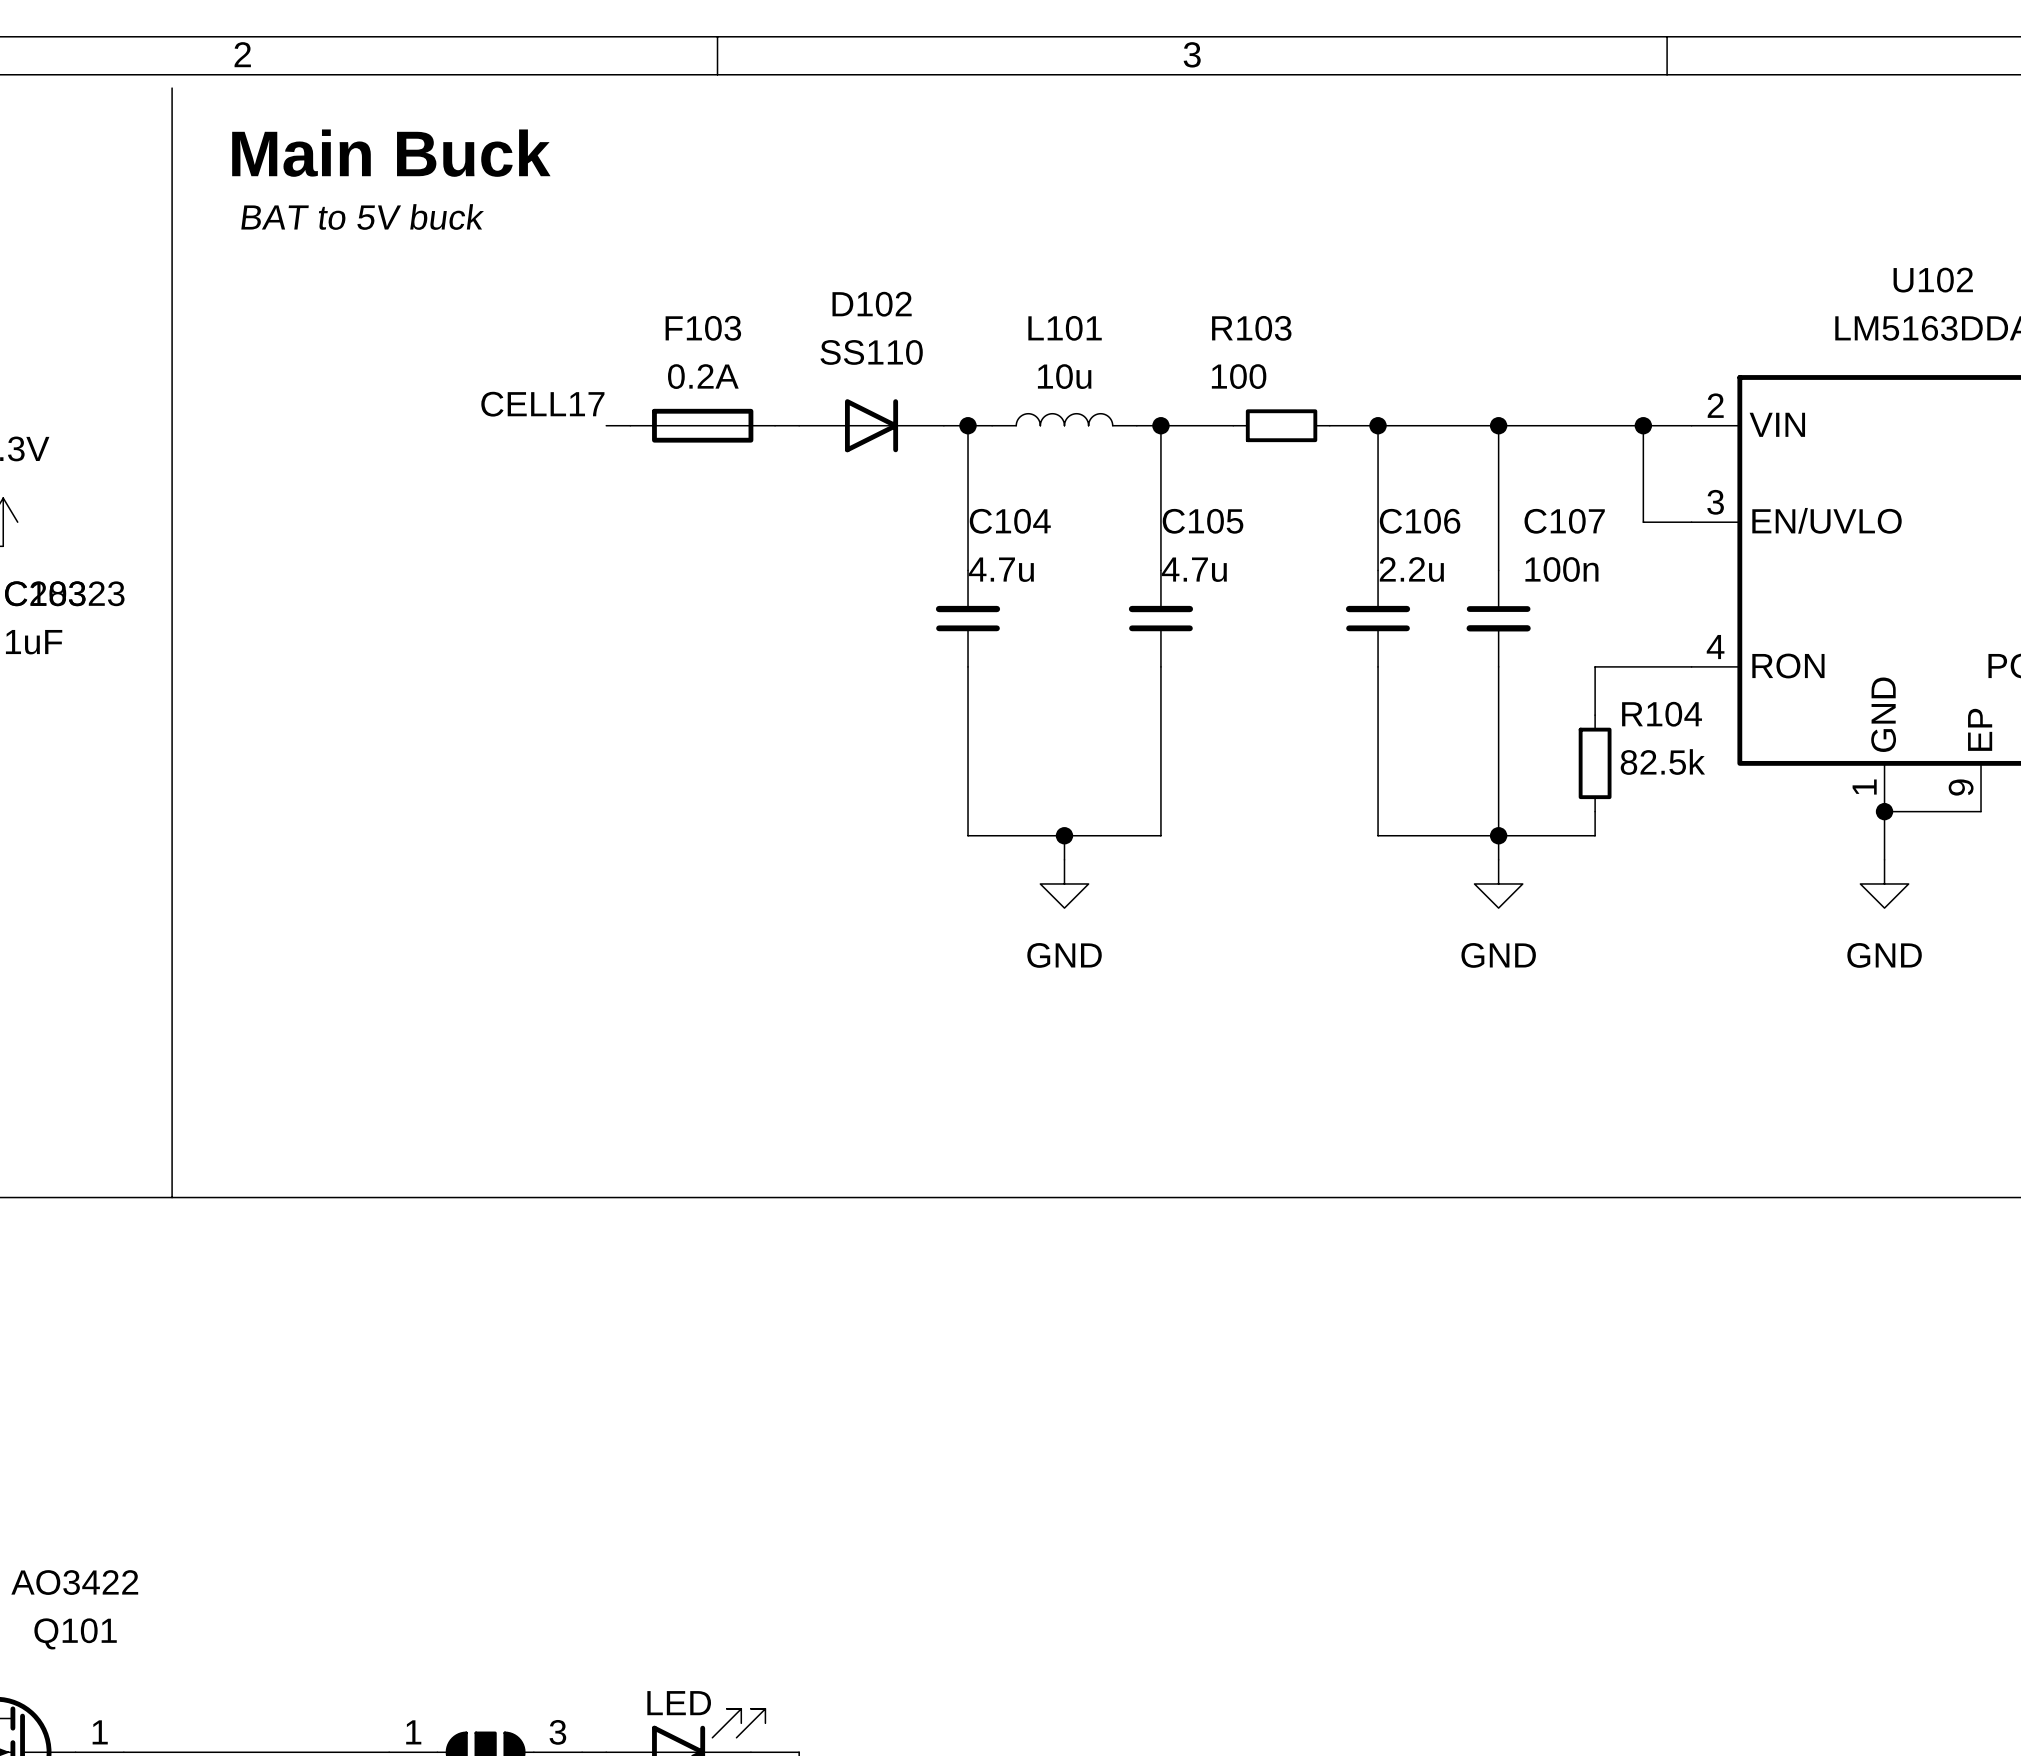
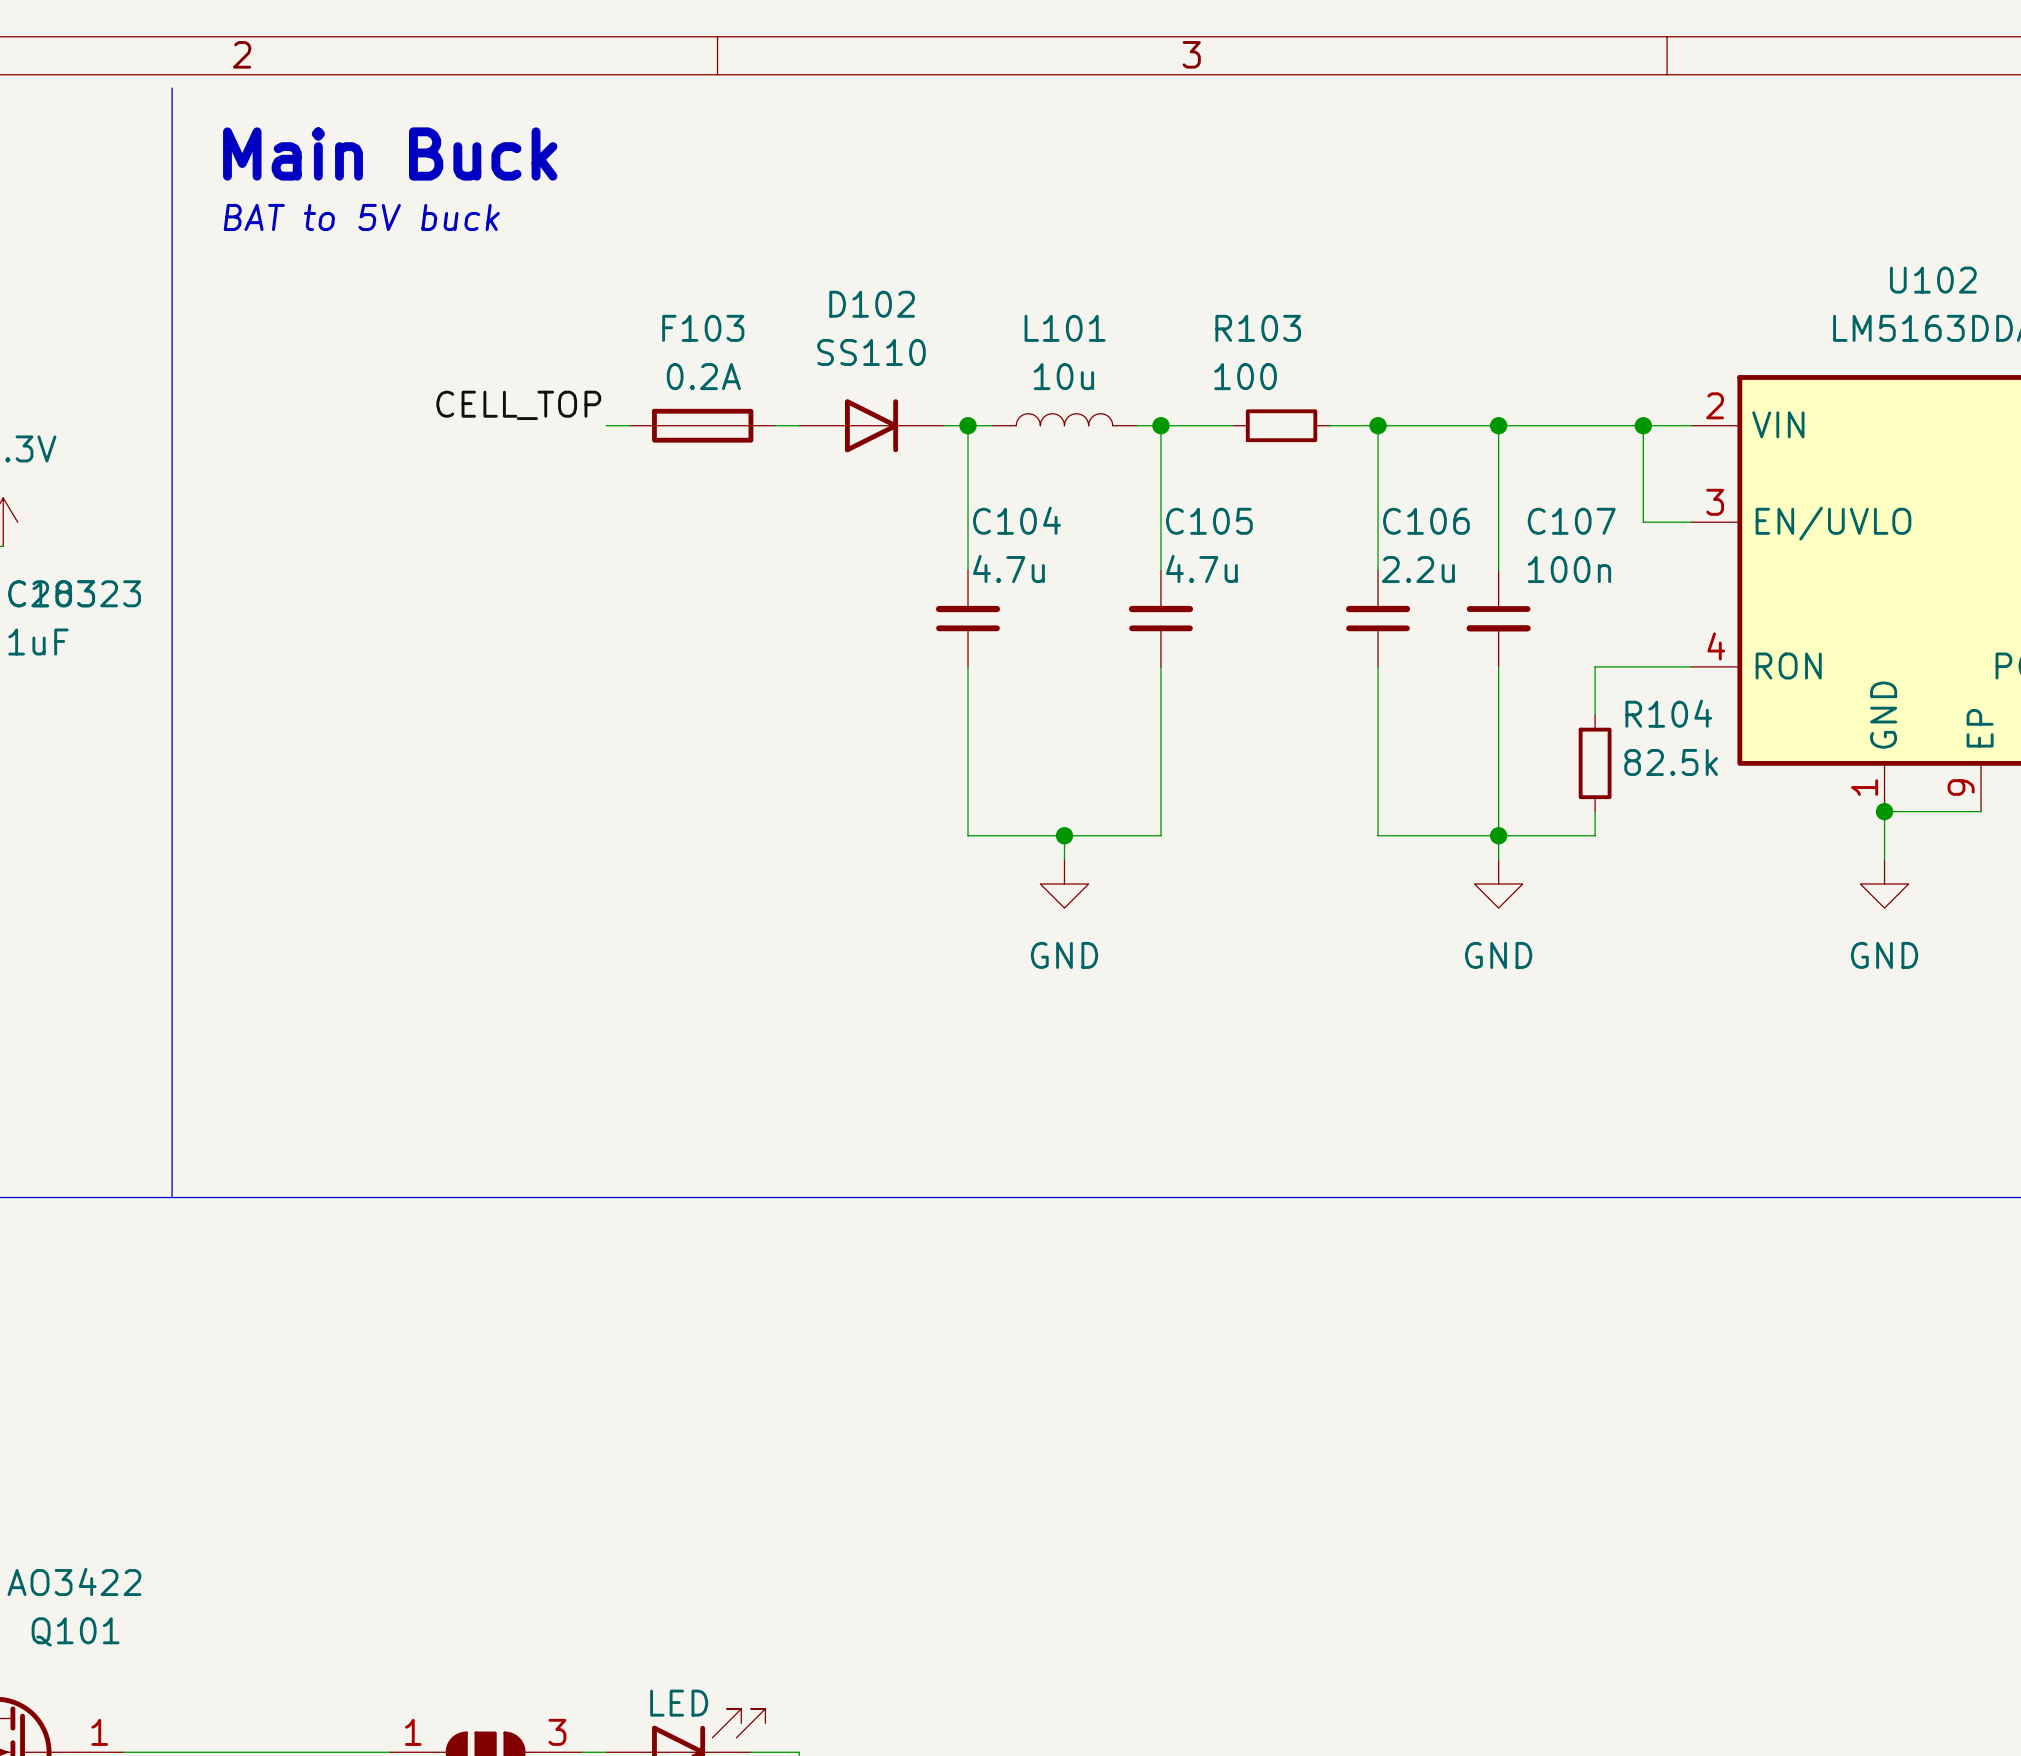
label: CELL17 (542, 404) -> CELL_TOP (518, 405)

